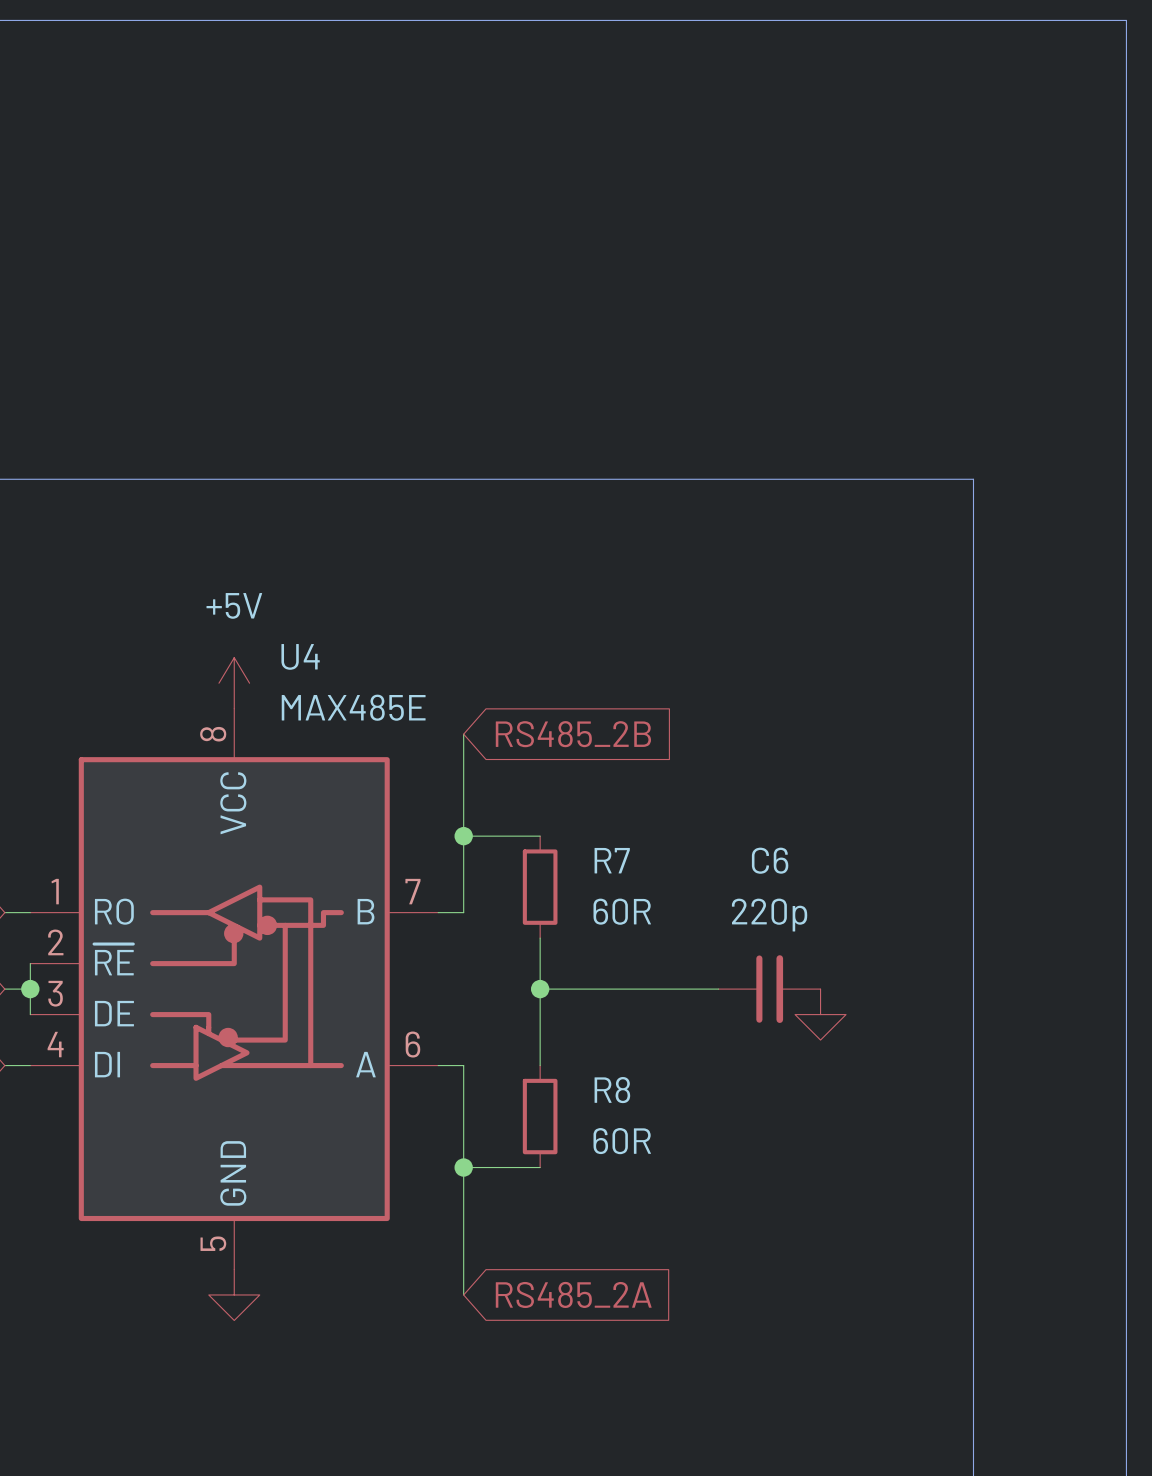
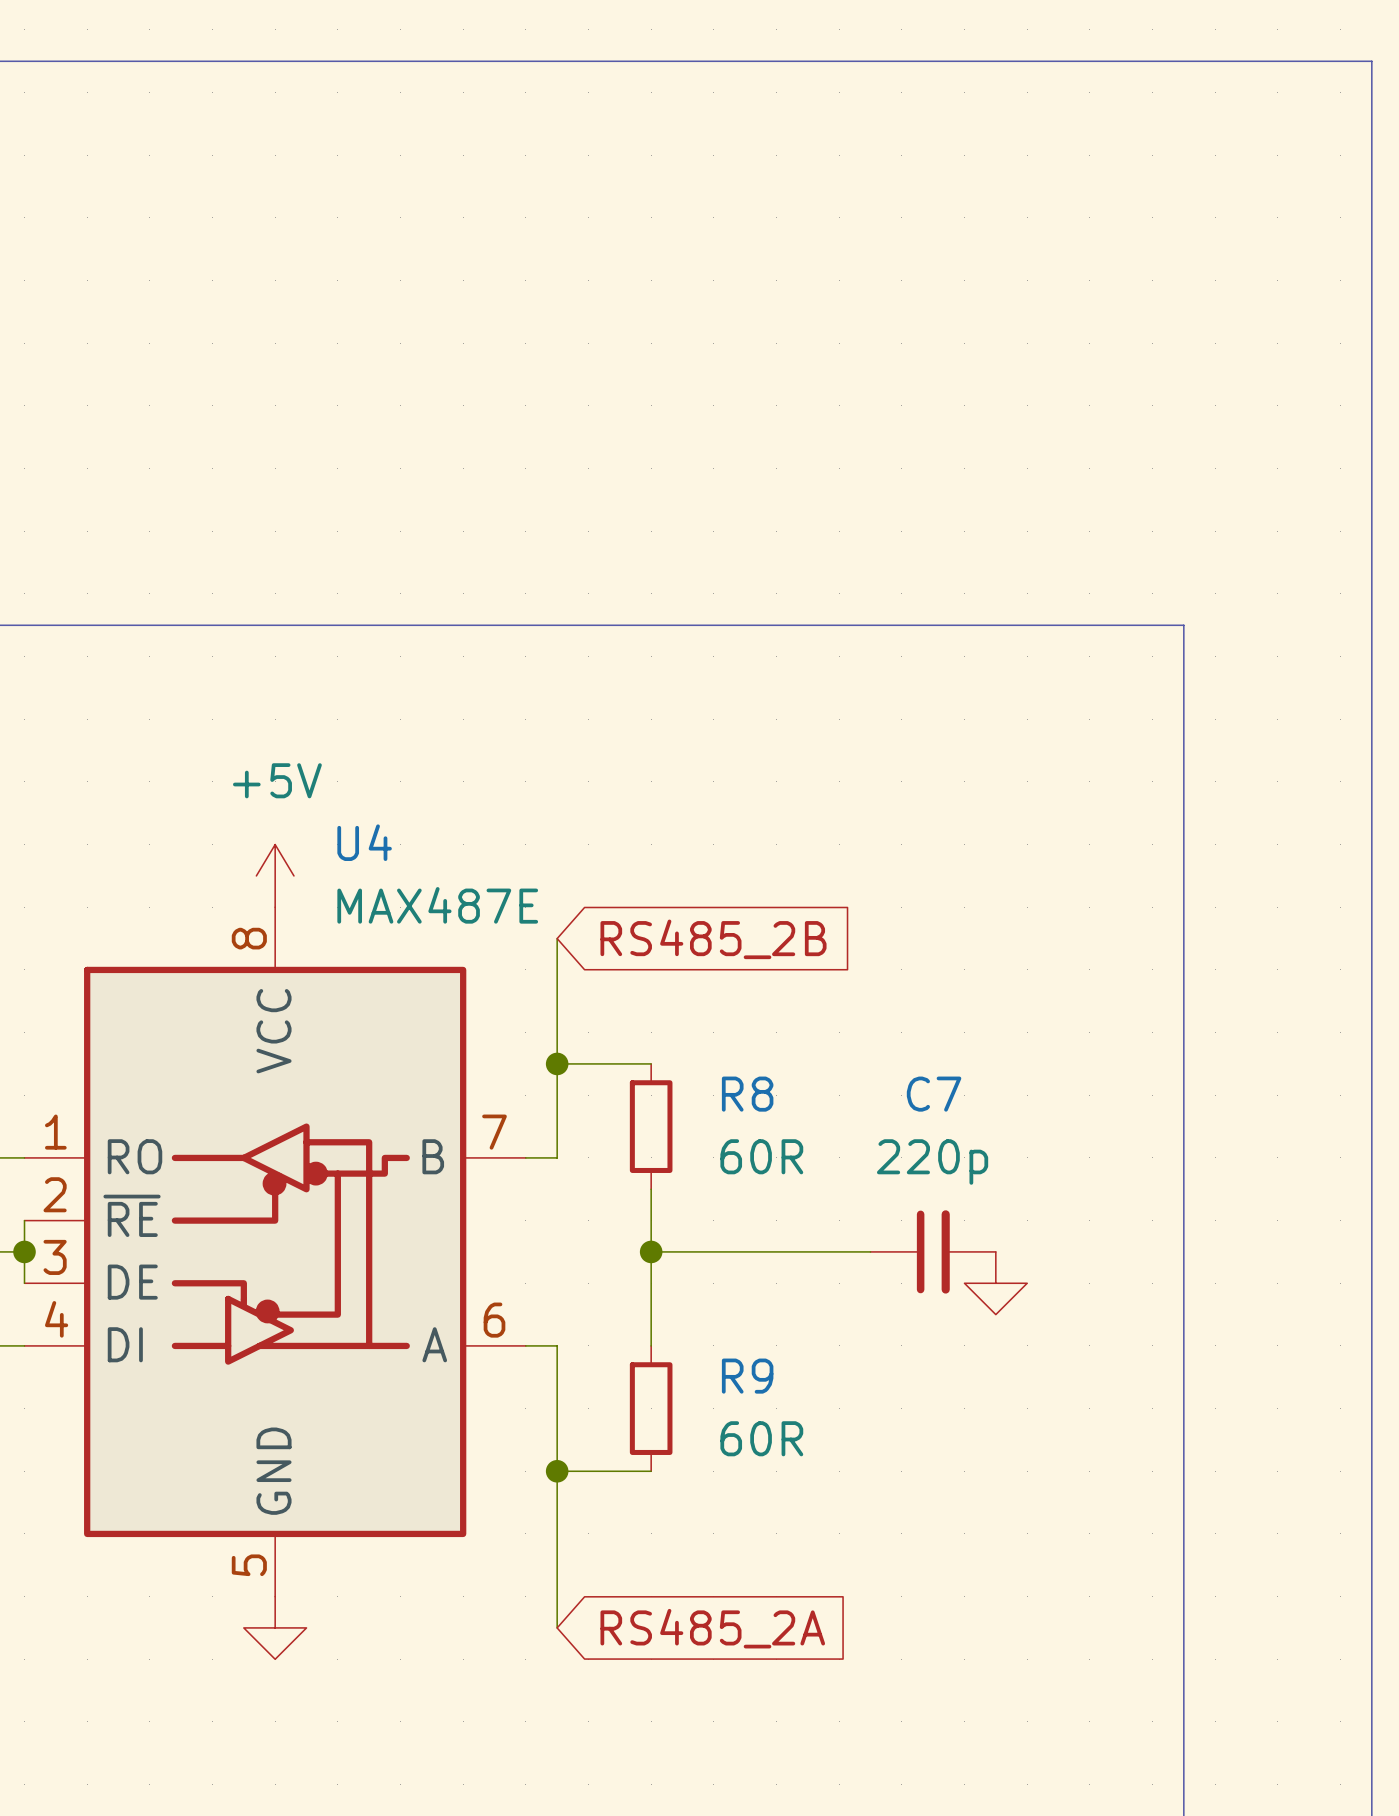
U4 value: MAX485E (353, 707) -> MAX487E (437, 905)
R7 name: R7 (612, 860) -> R8 (747, 1094)
C6 name: C6 (770, 860) -> C7 (934, 1094)
R8 name: R8 (612, 1090) -> R9 (747, 1376)

